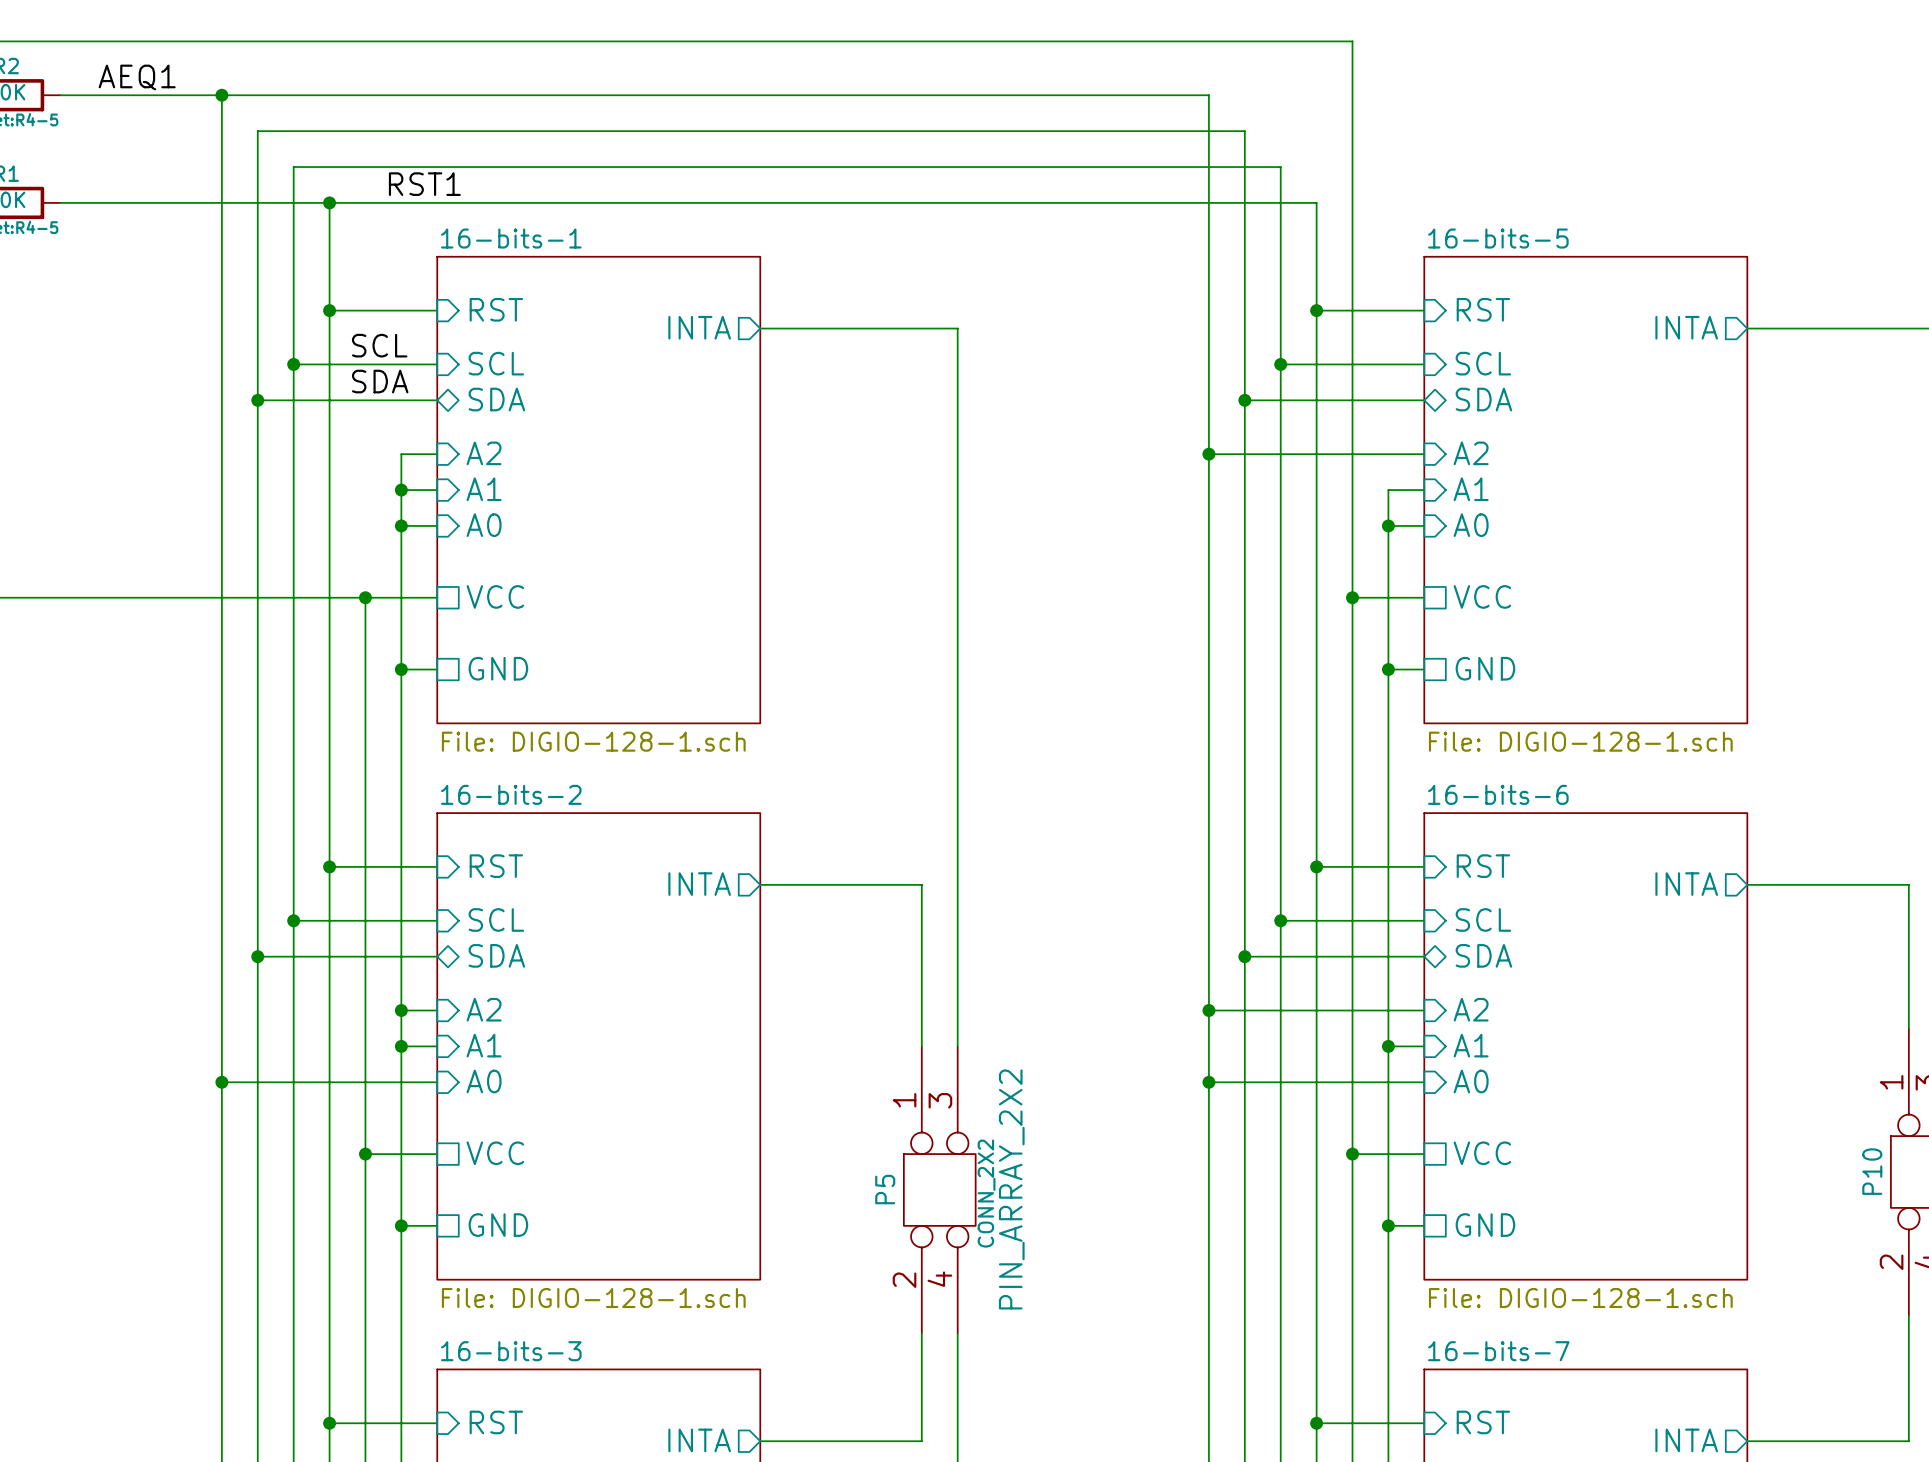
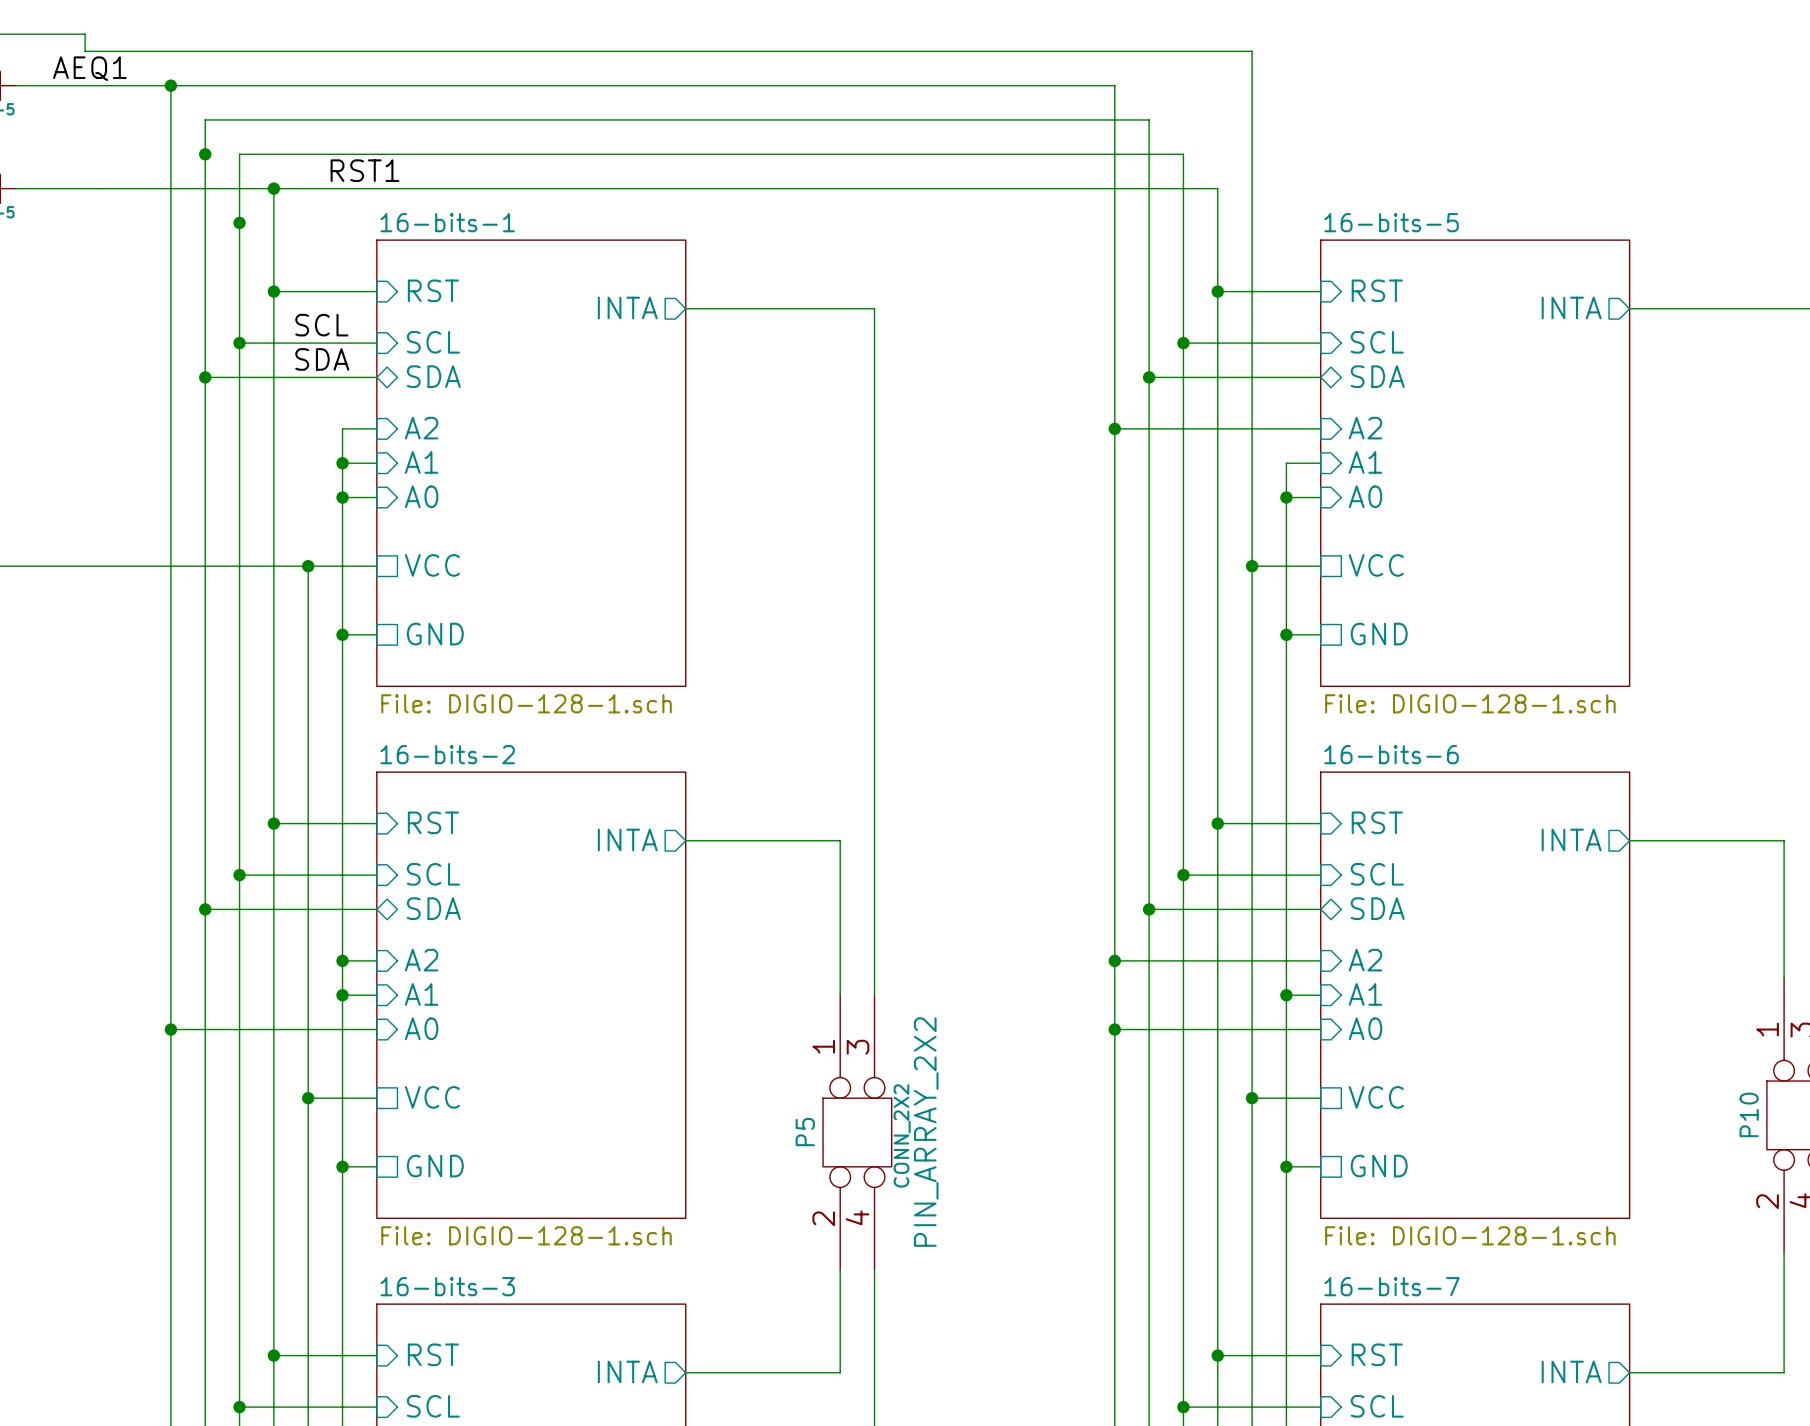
wire: (132, 41) (1352, 41) (1352, 59) -> (85, 34) (85, 51) (1252, 51)
junction: none -> (205, 154)
junction: none -> (239, 222)

